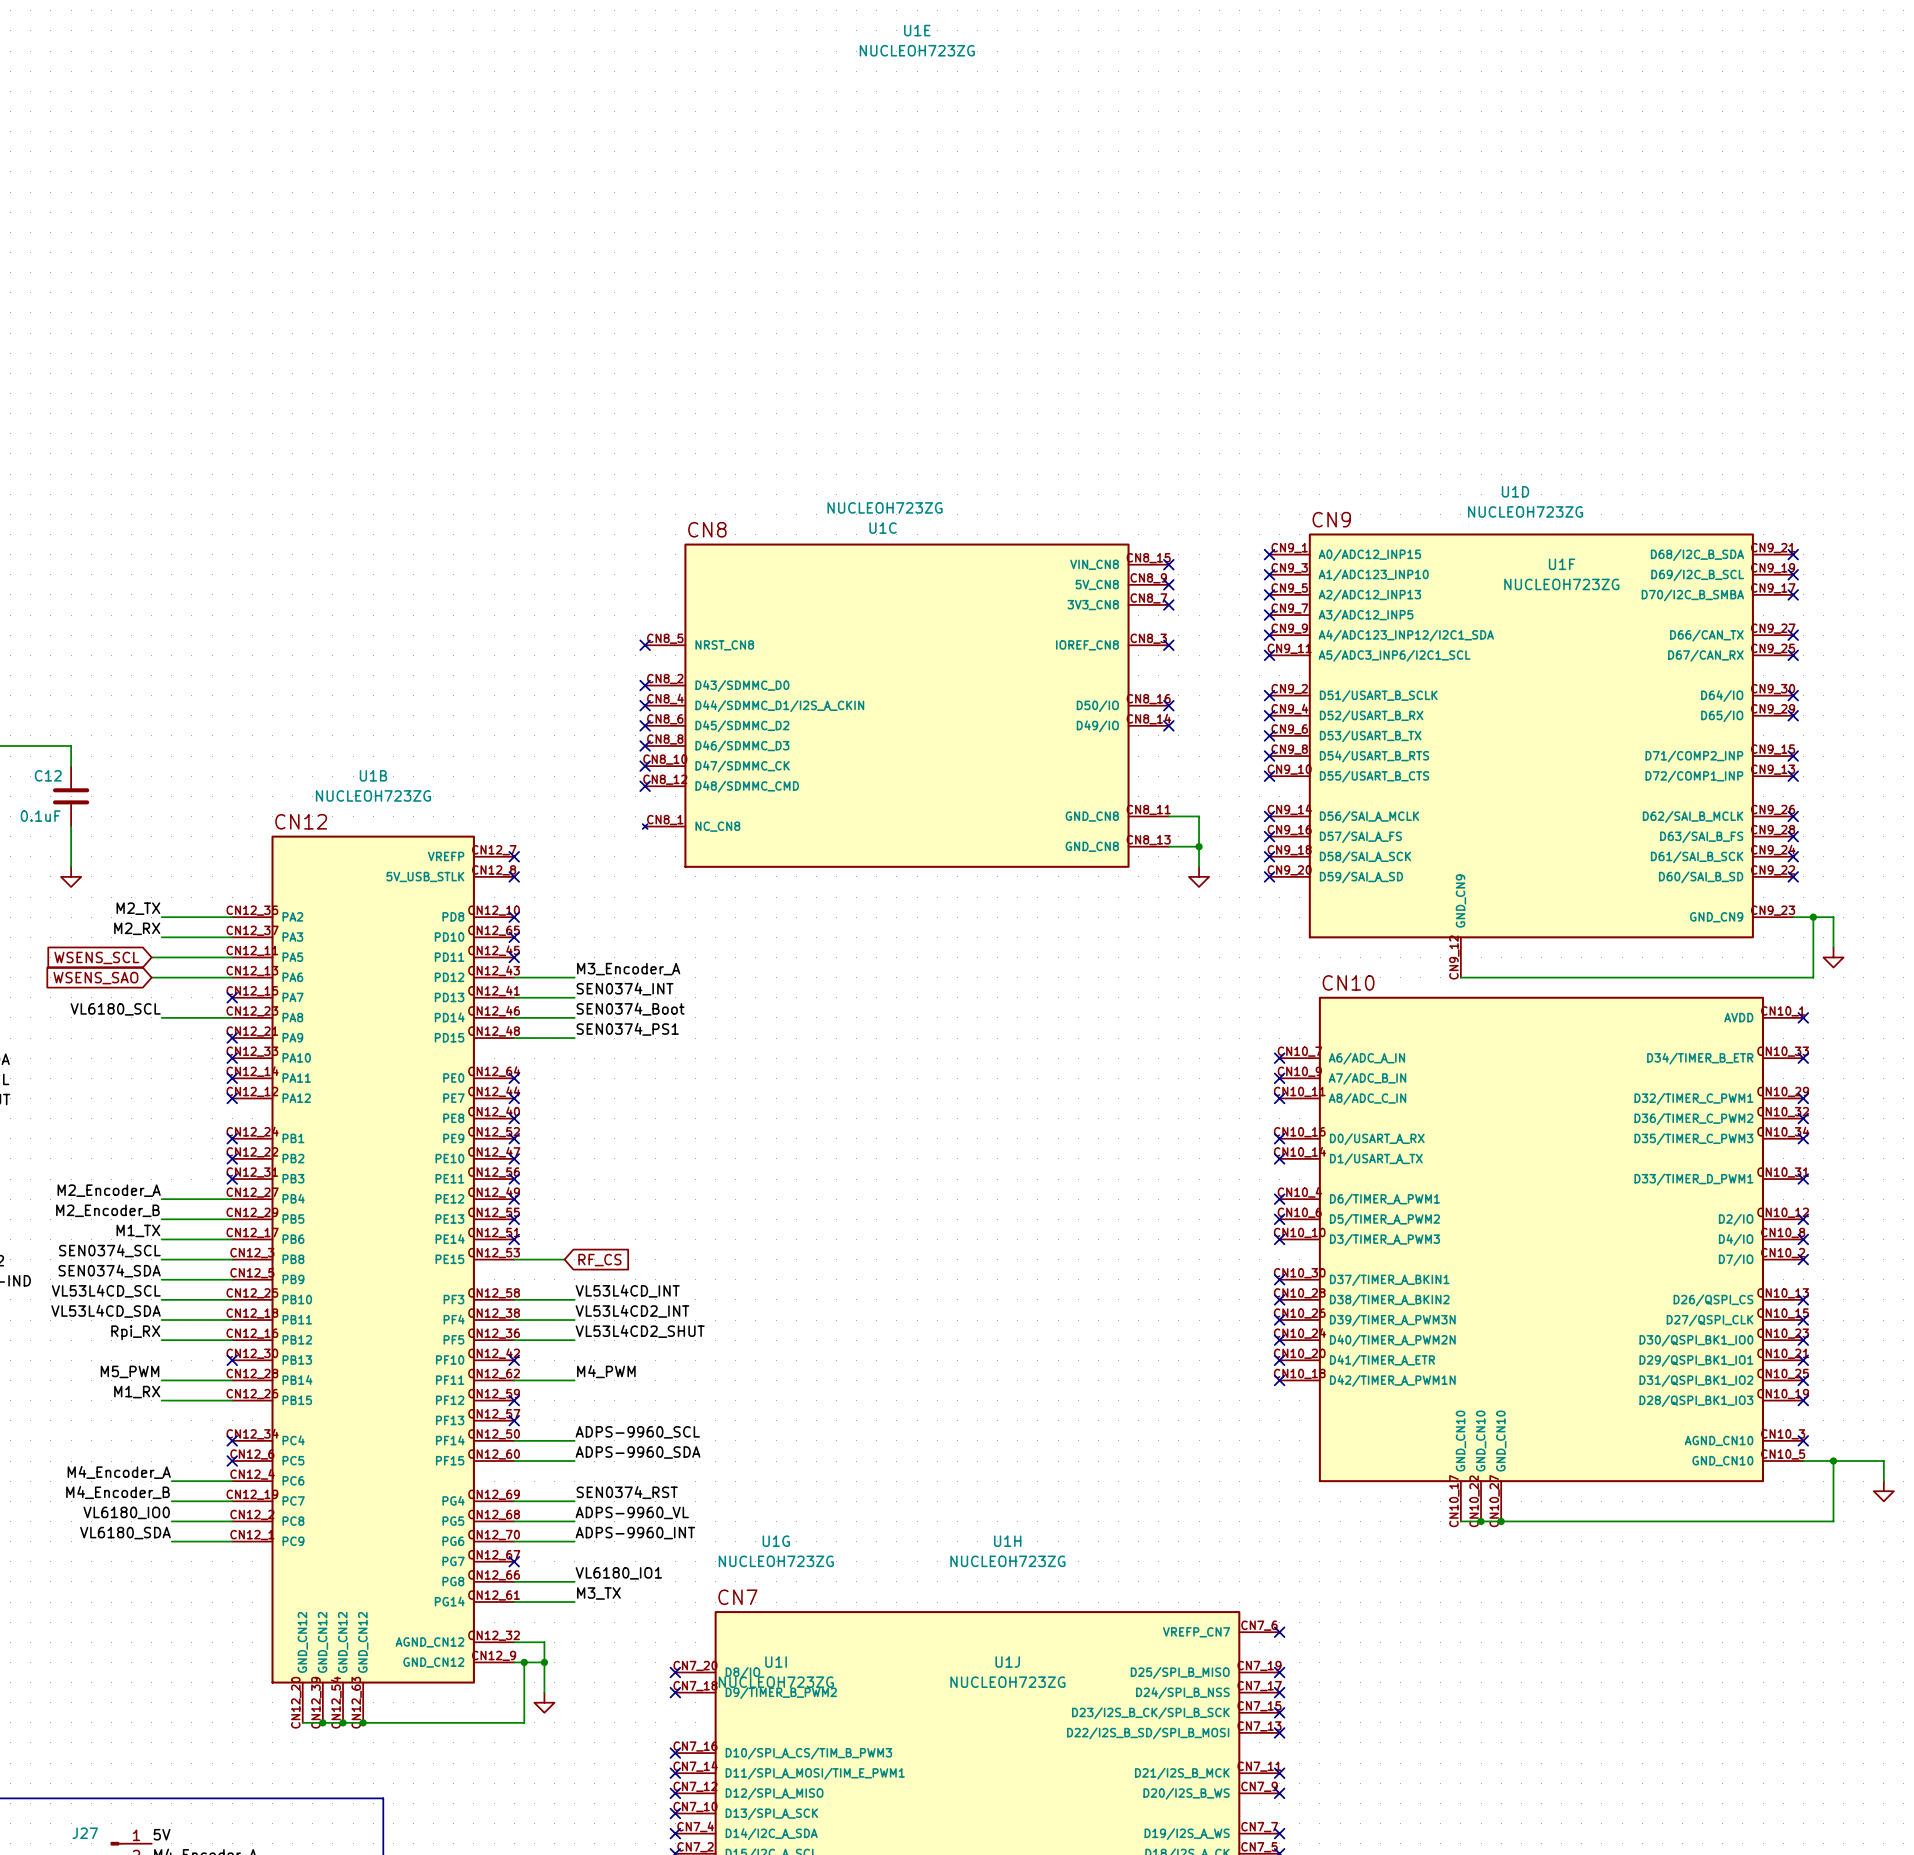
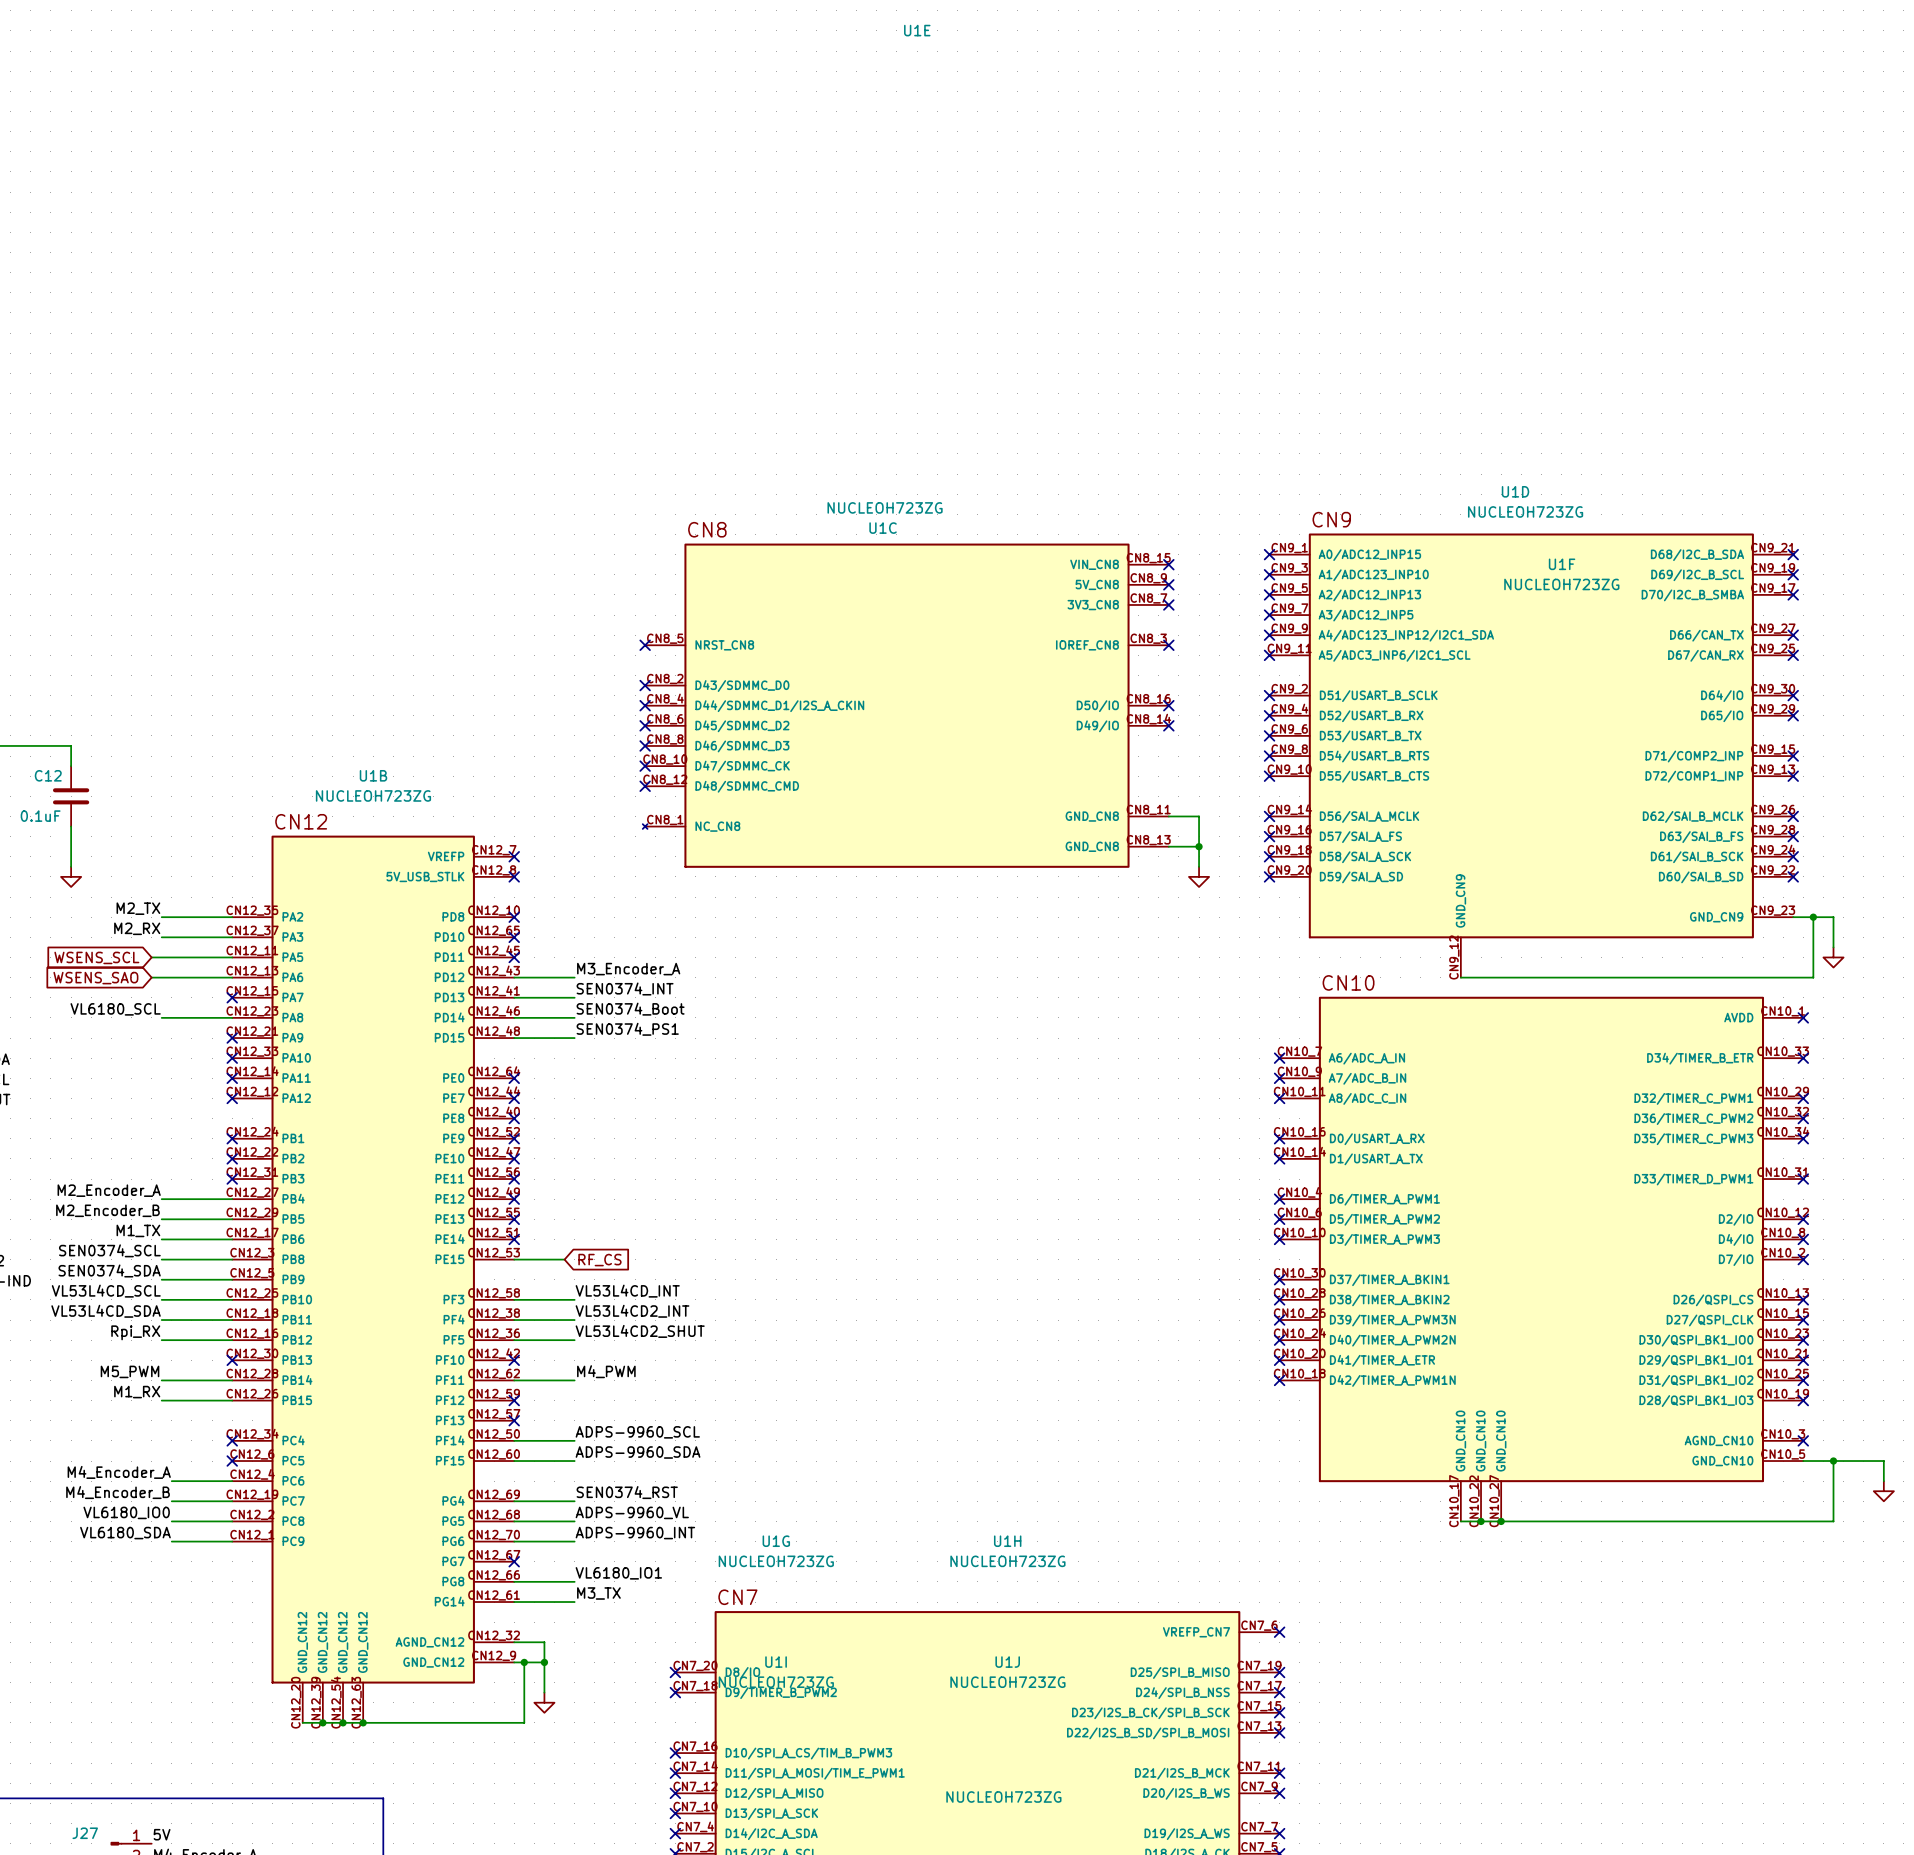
U1E value position: NUCLEOH723ZG (917, 50) -> NUCLEOH723ZG (1003, 1796)

